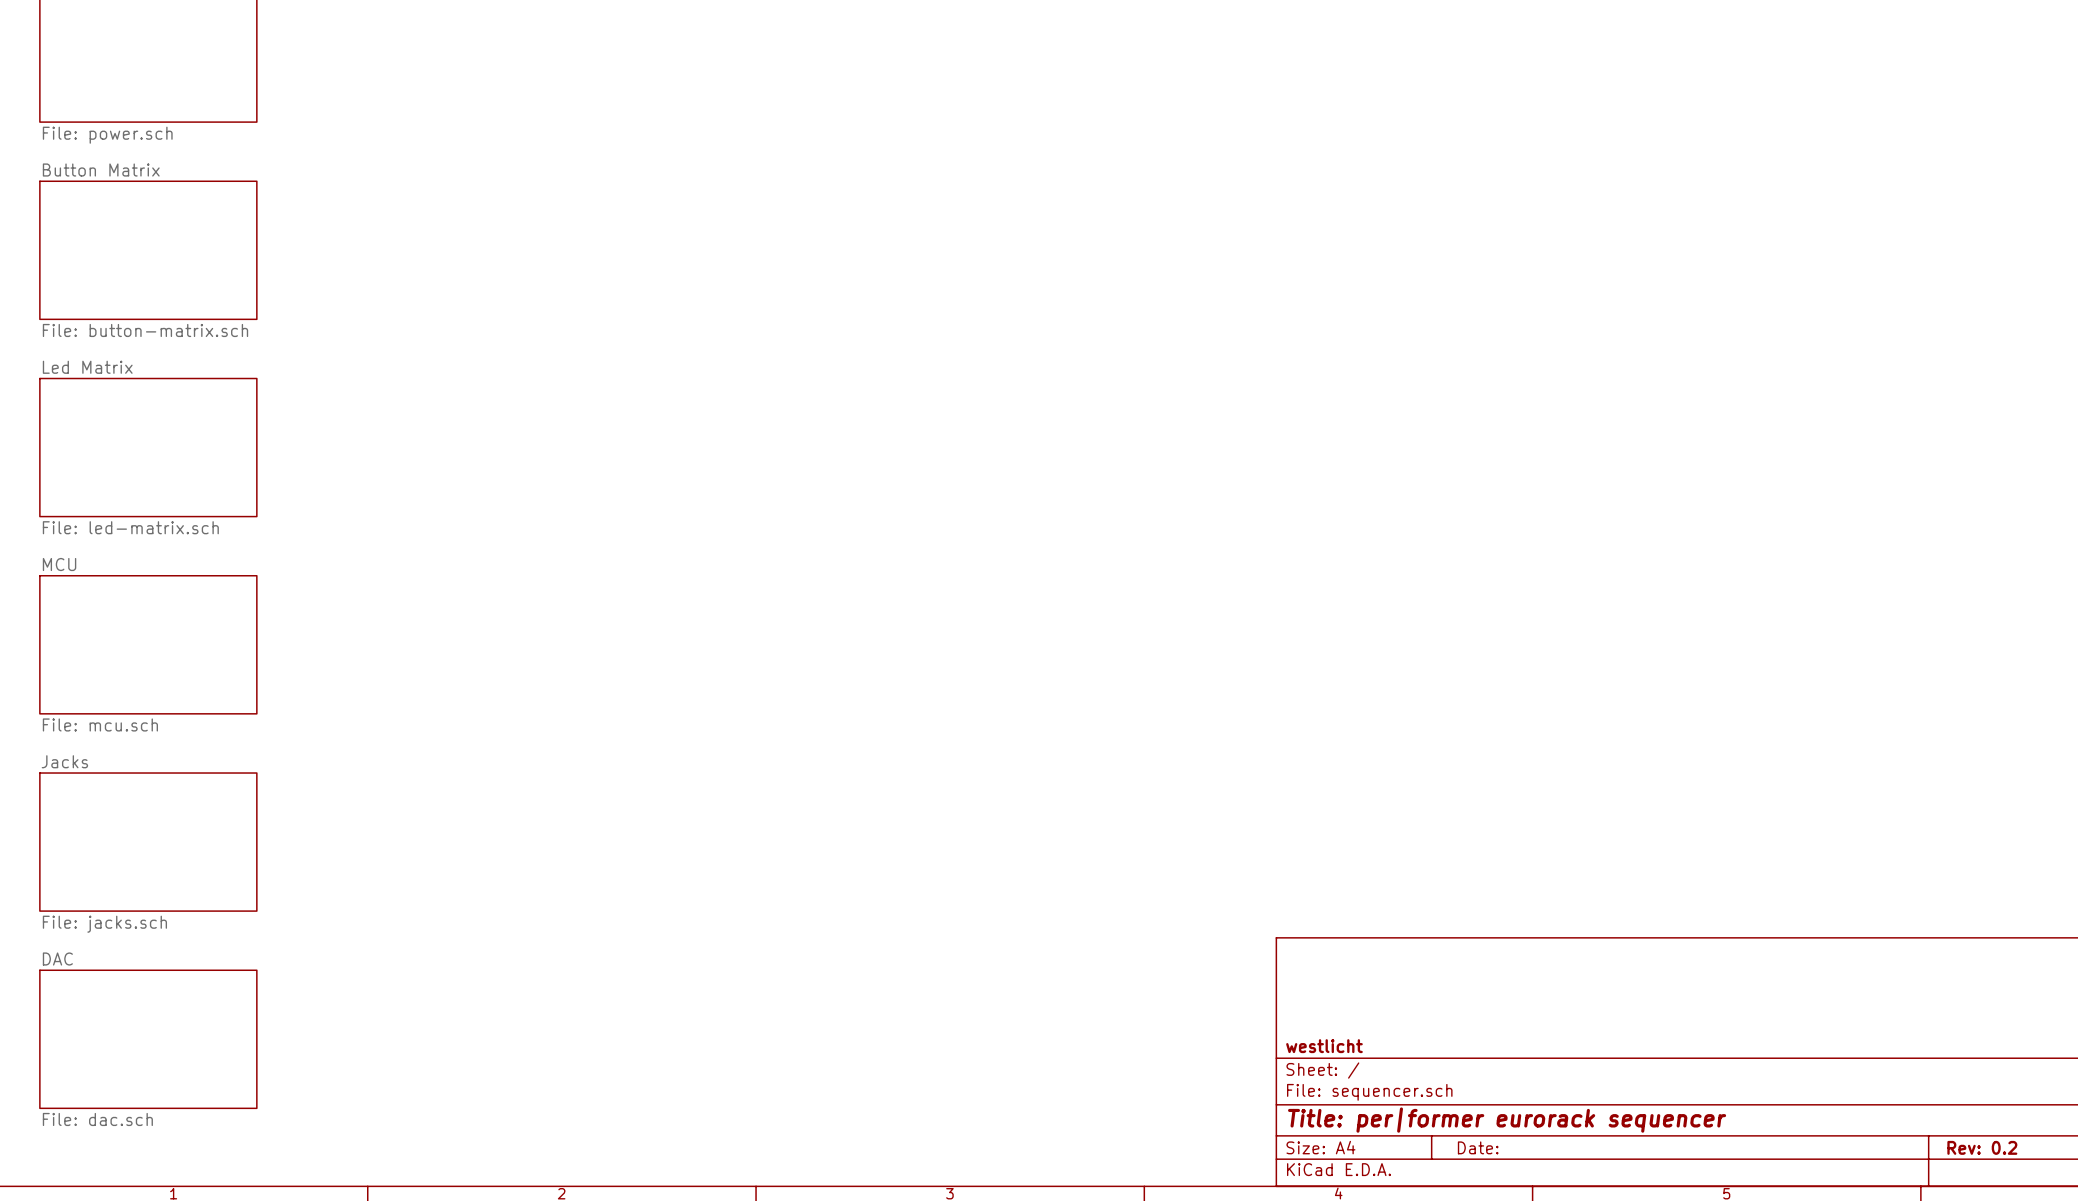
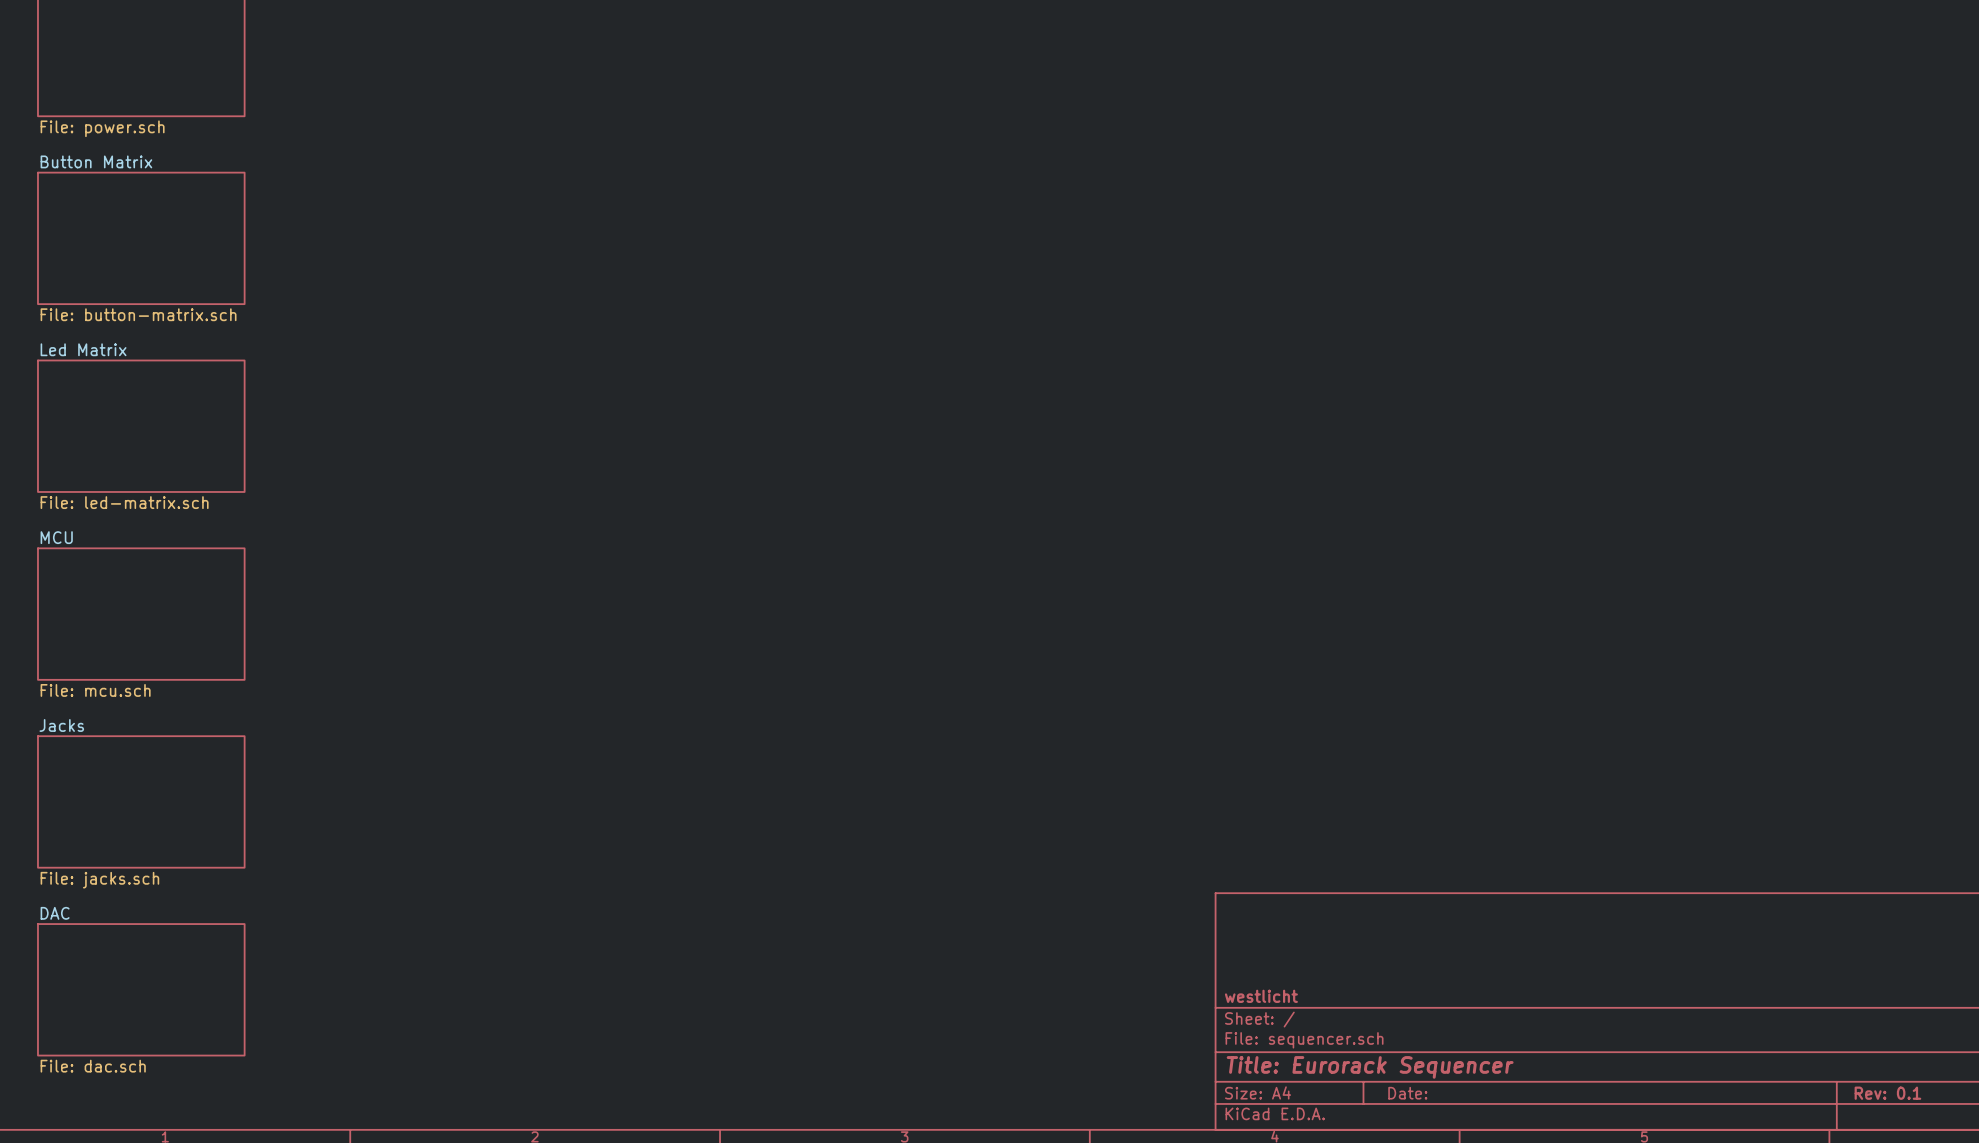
title block: Title: per|former eurorack sequencer (1507, 1120) -> Title: Eurorack Sequencer (1370, 1067)
title block: Rev: 0.2 (1982, 1147) -> Rev: 0.1 (1887, 1093)

